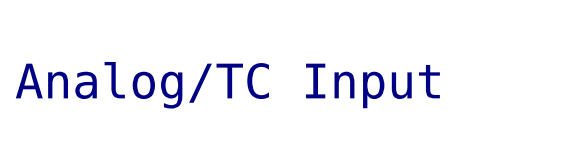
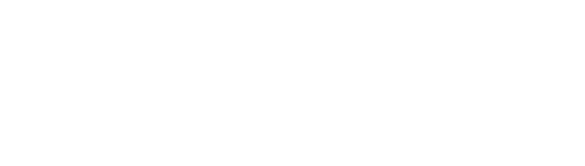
text: Analog/TC Input (227, 85) -> none

